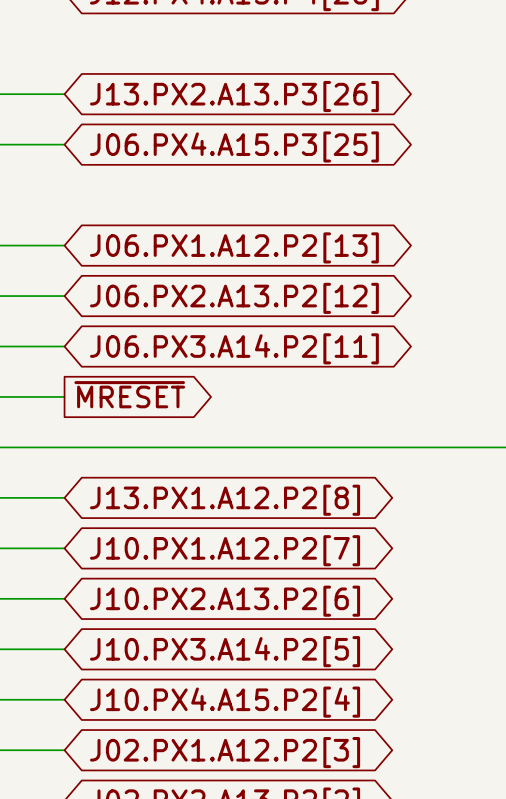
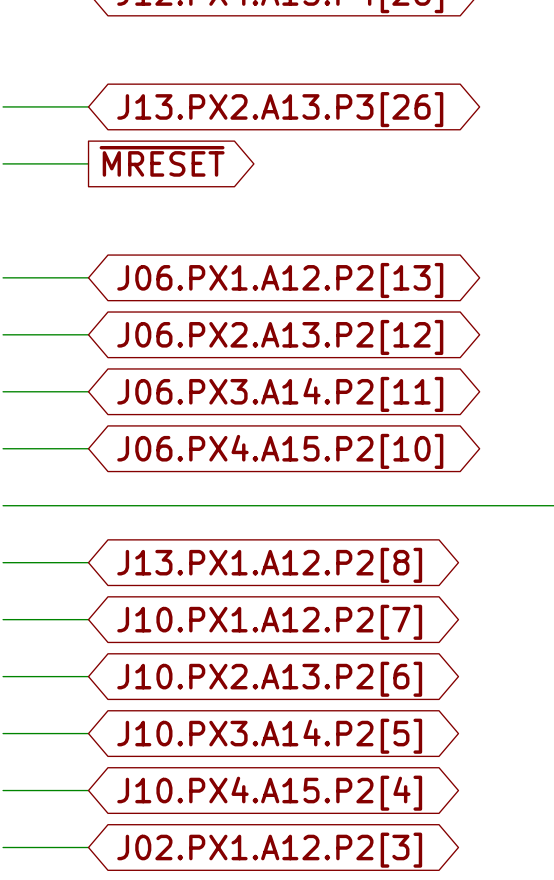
global label shape: bidirectional (234, 146) -> output (162, 161)
global label: J06.PX4.A15.P3[25] (234, 146) -> ~{MRESET} (162, 161)
global label shape: output (129, 394) -> bidirectional (280, 451)
global label: ~{MRESET} (129, 394) -> J06.PX4.A15.P2[10] (280, 451)

